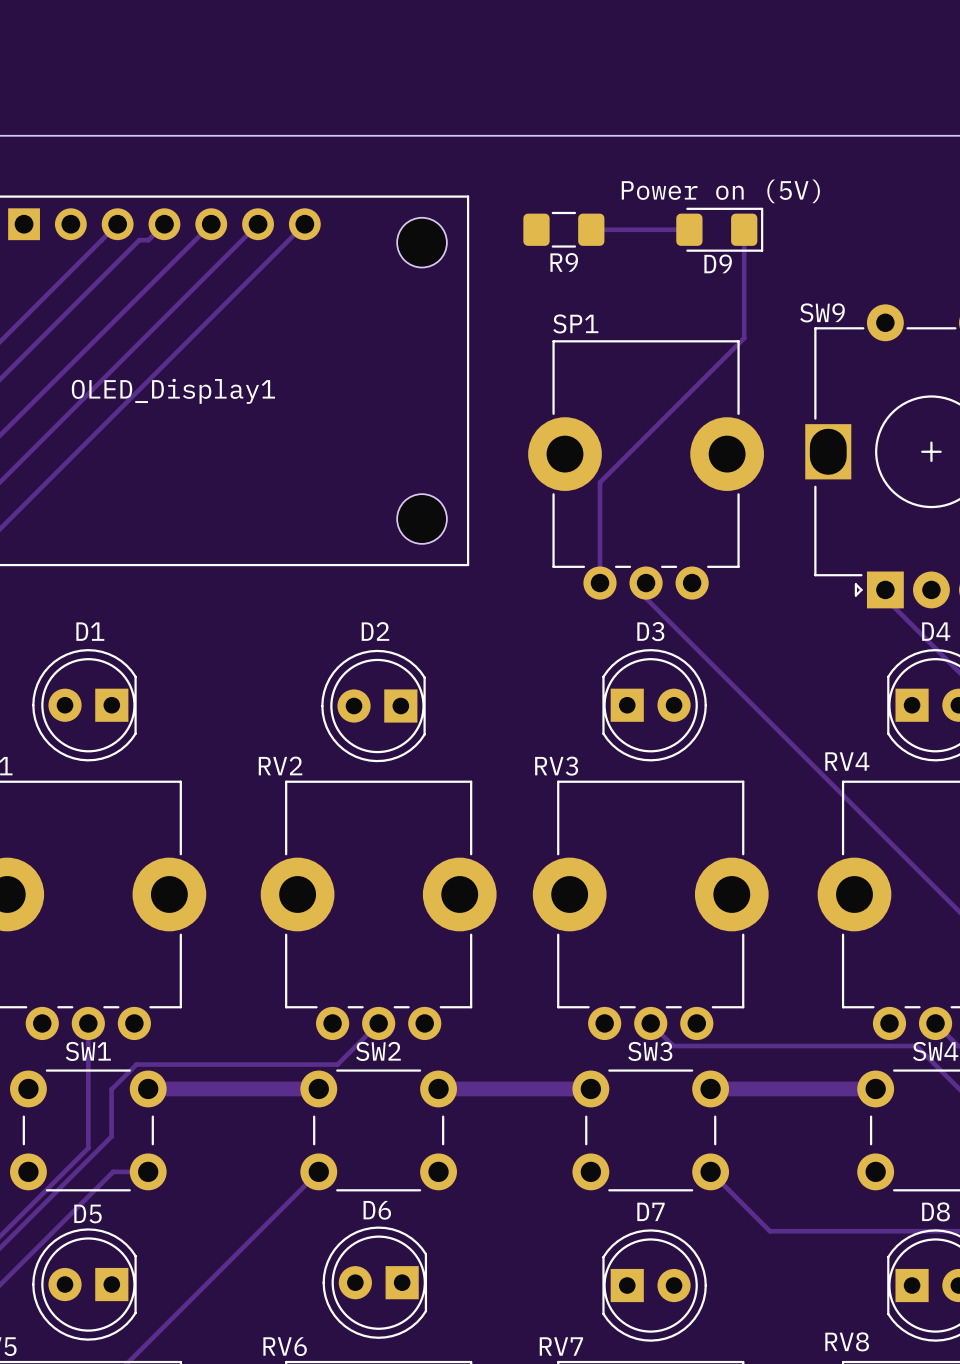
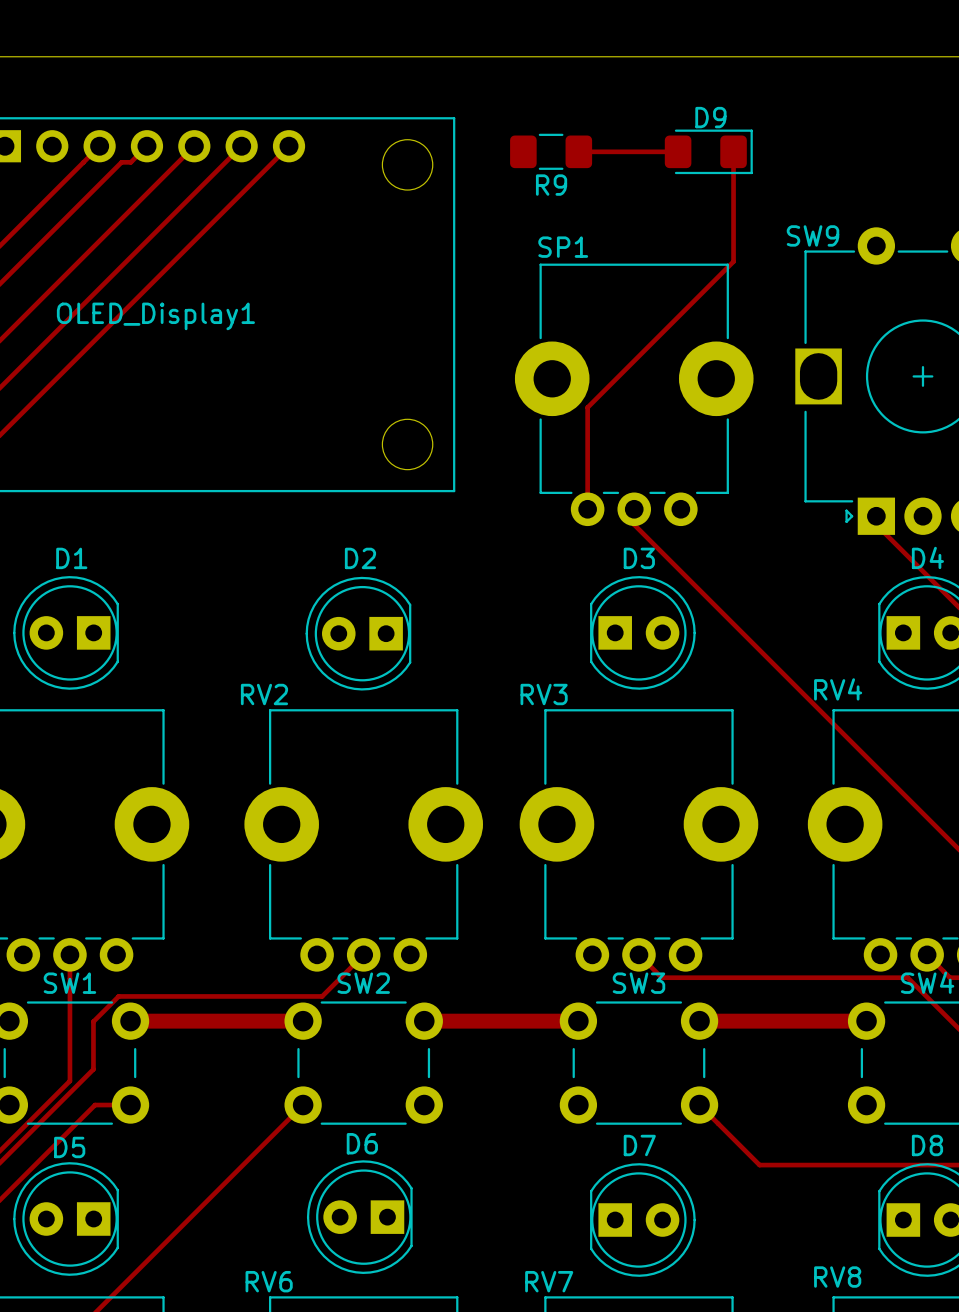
text: Power on (5V) (720, 191) -> none
D9 name position: D9 (718, 263) -> D9 (710, 117)

